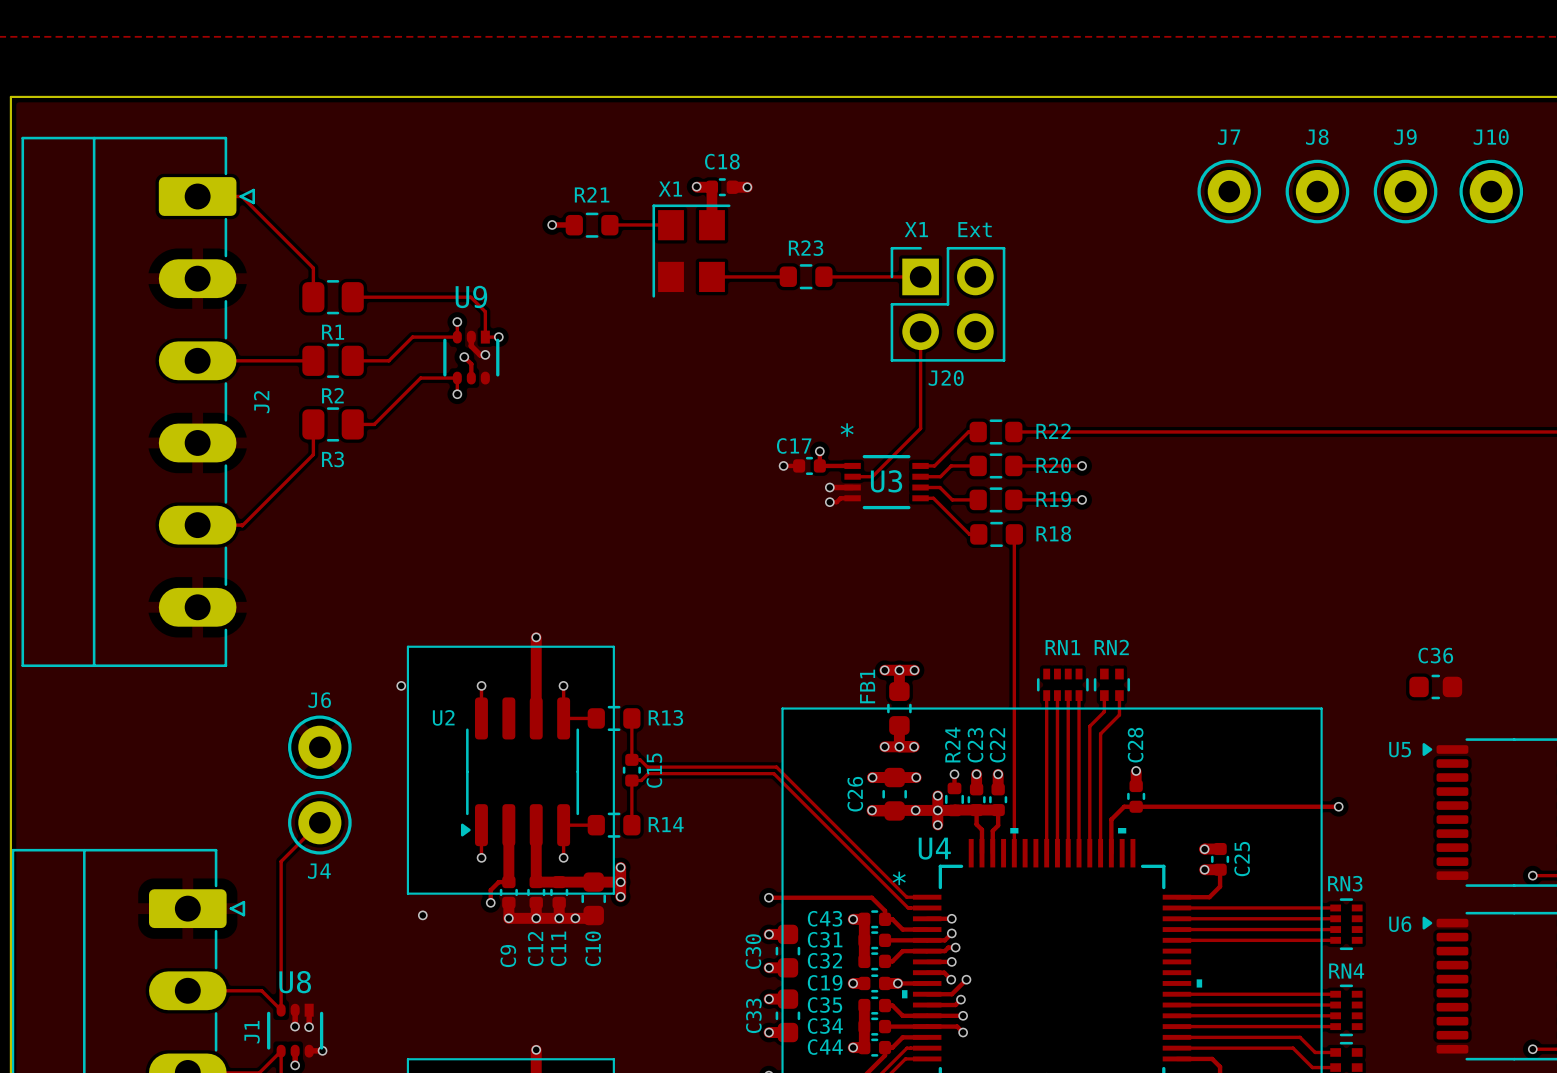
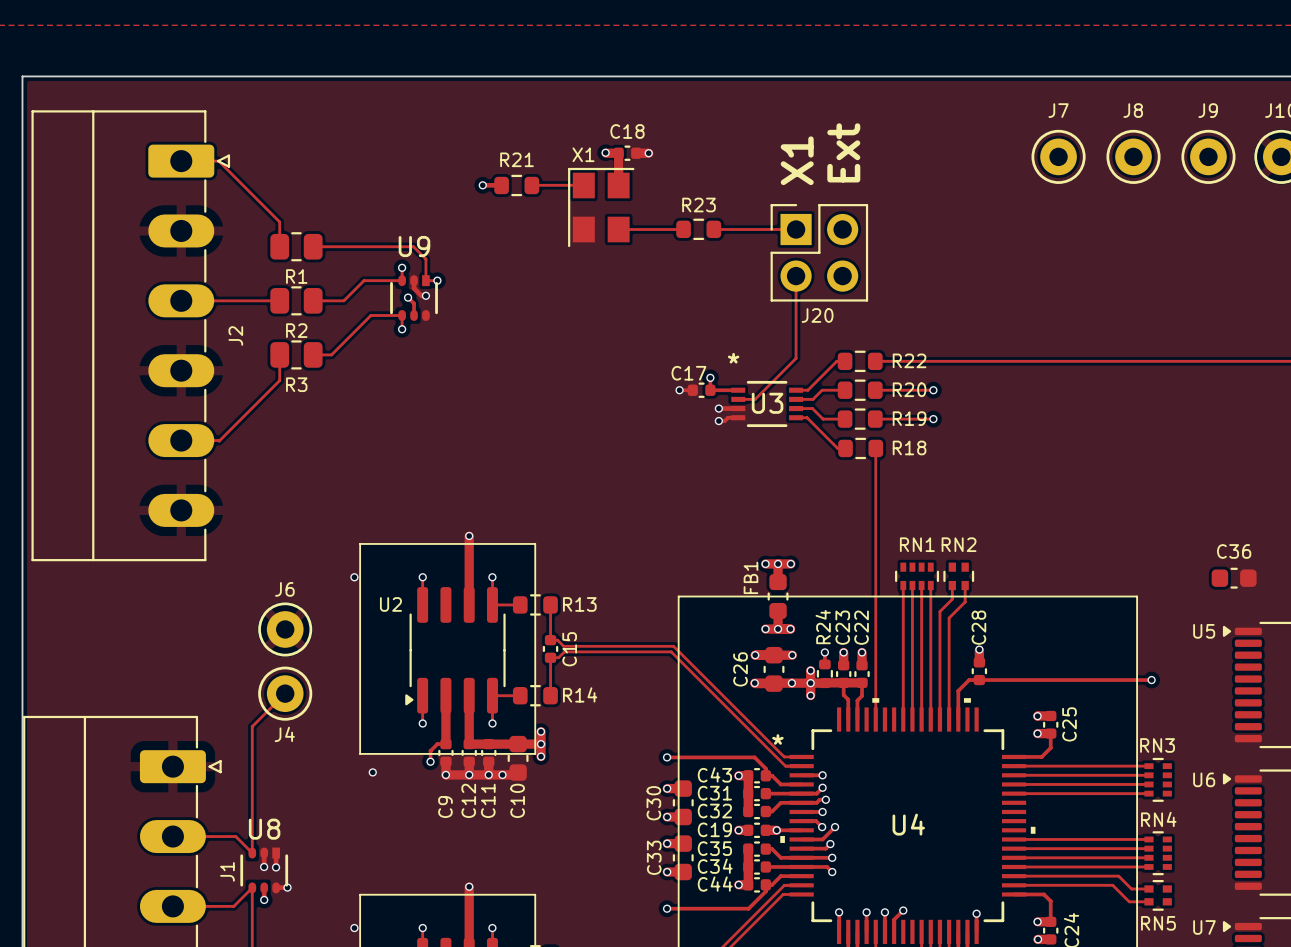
text: none -> Ext (843, 152)
text: X1 (916, 229) -> none
text: Ext (975, 229) -> X1 (797, 160)
U4 name position: U4 (934, 848) -> U4 (908, 824)

